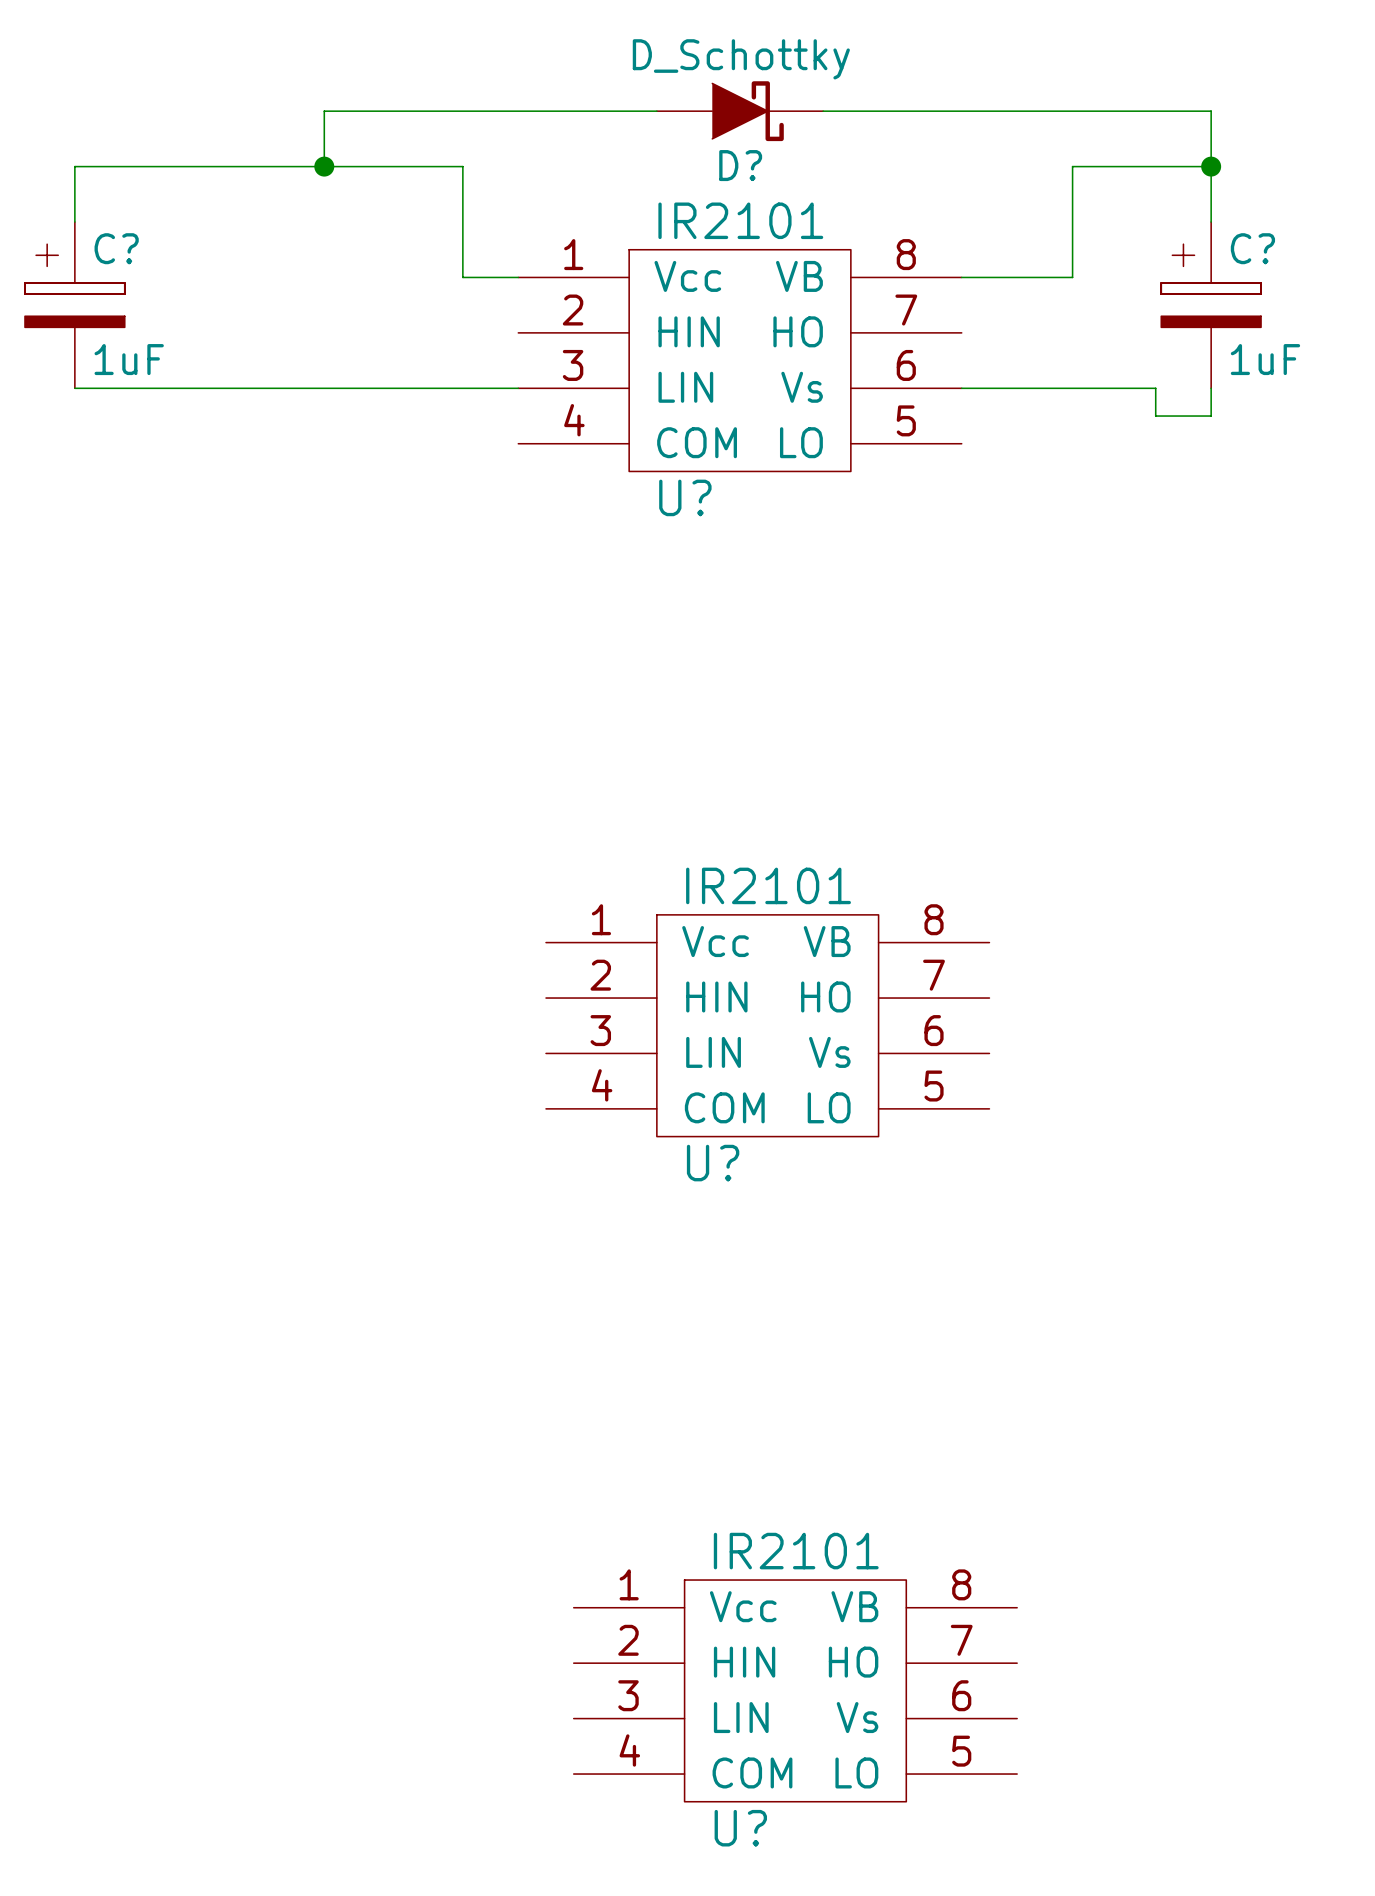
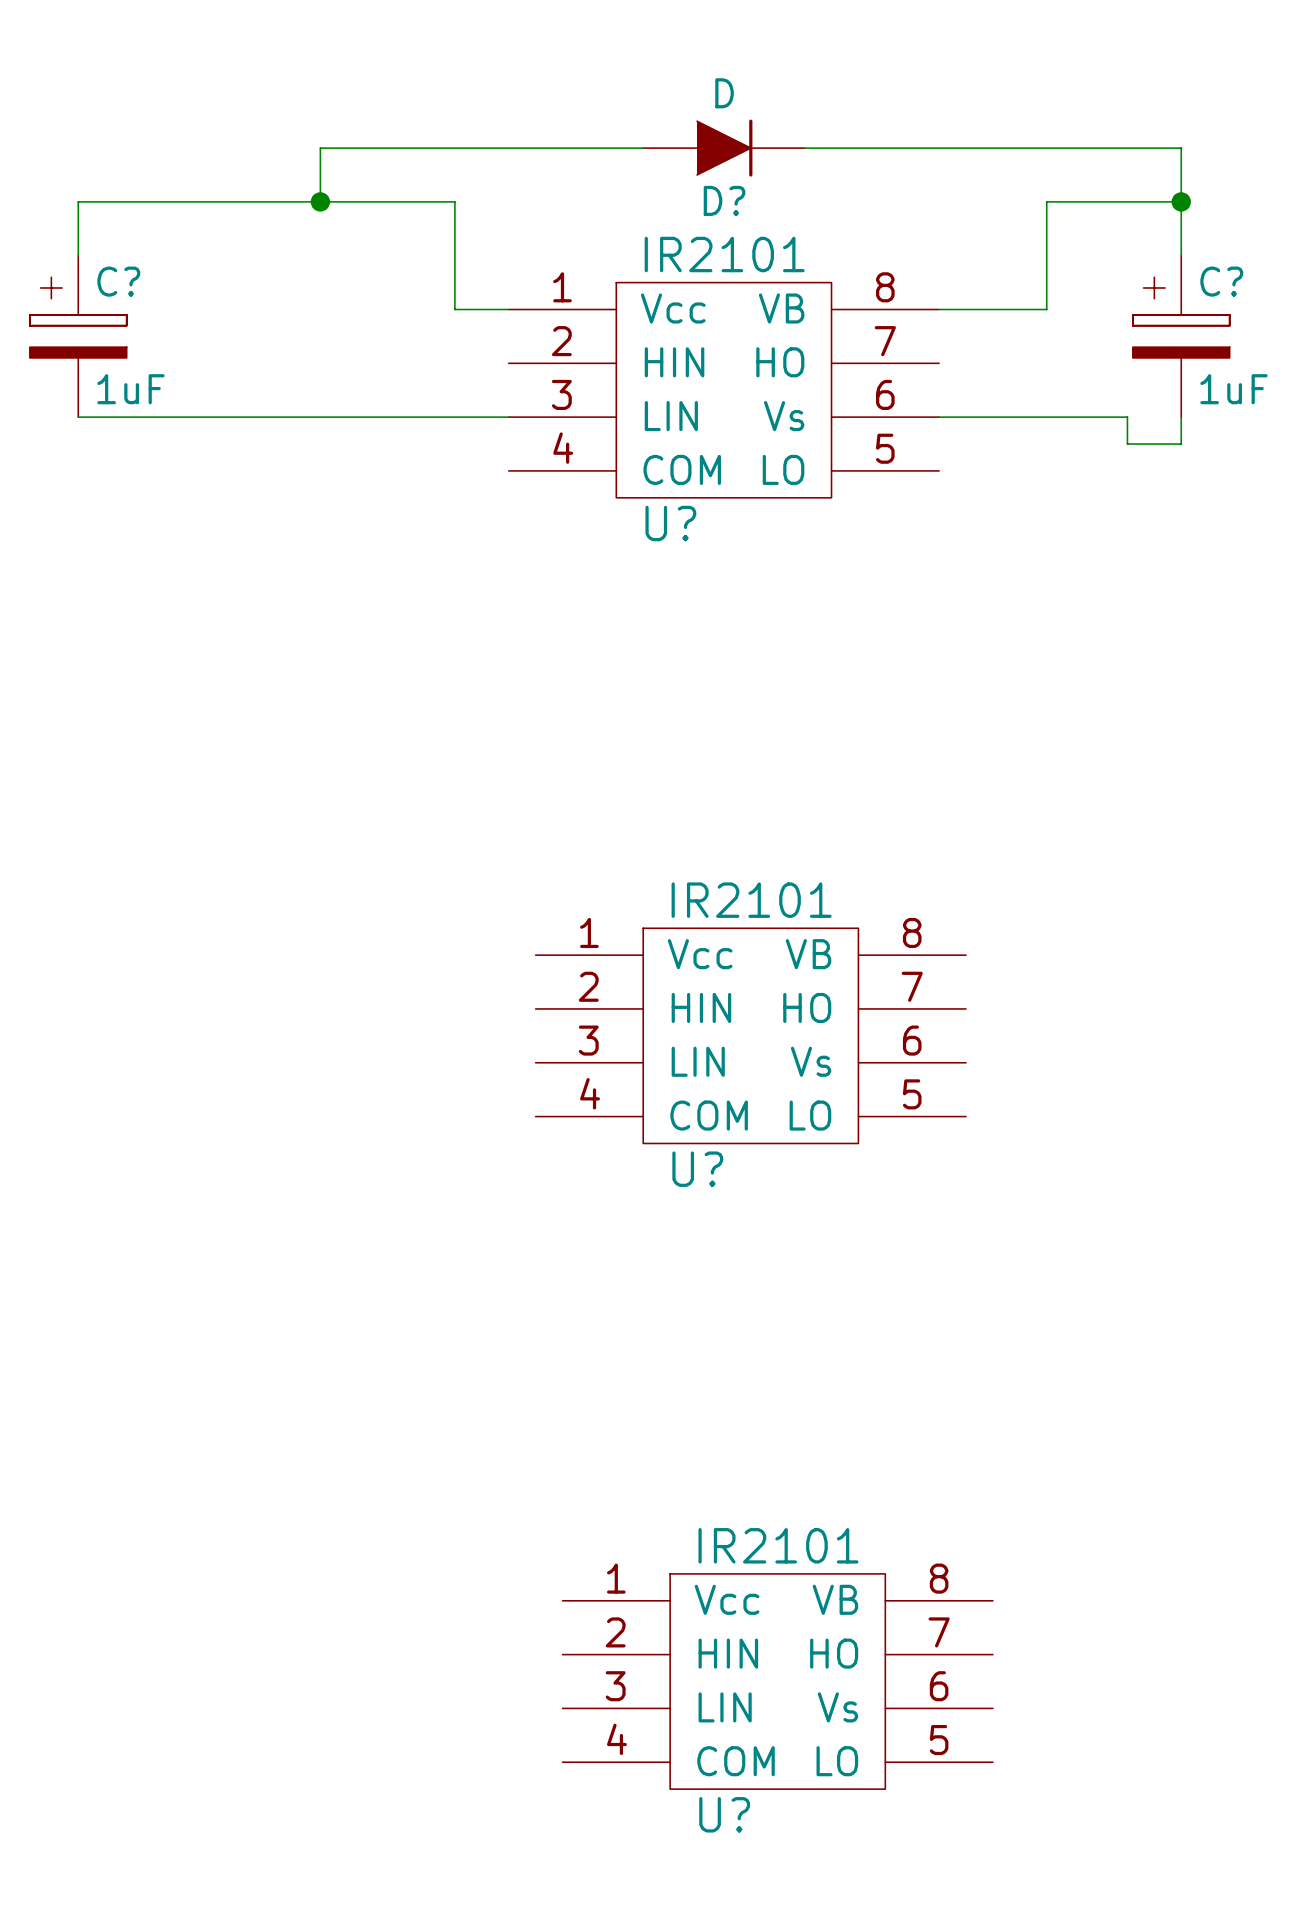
D? value: D_Schottky (741, 59) -> D (724, 93)
D? symbol: [656, 81, 824, 142] -> [643, 119, 805, 177]

